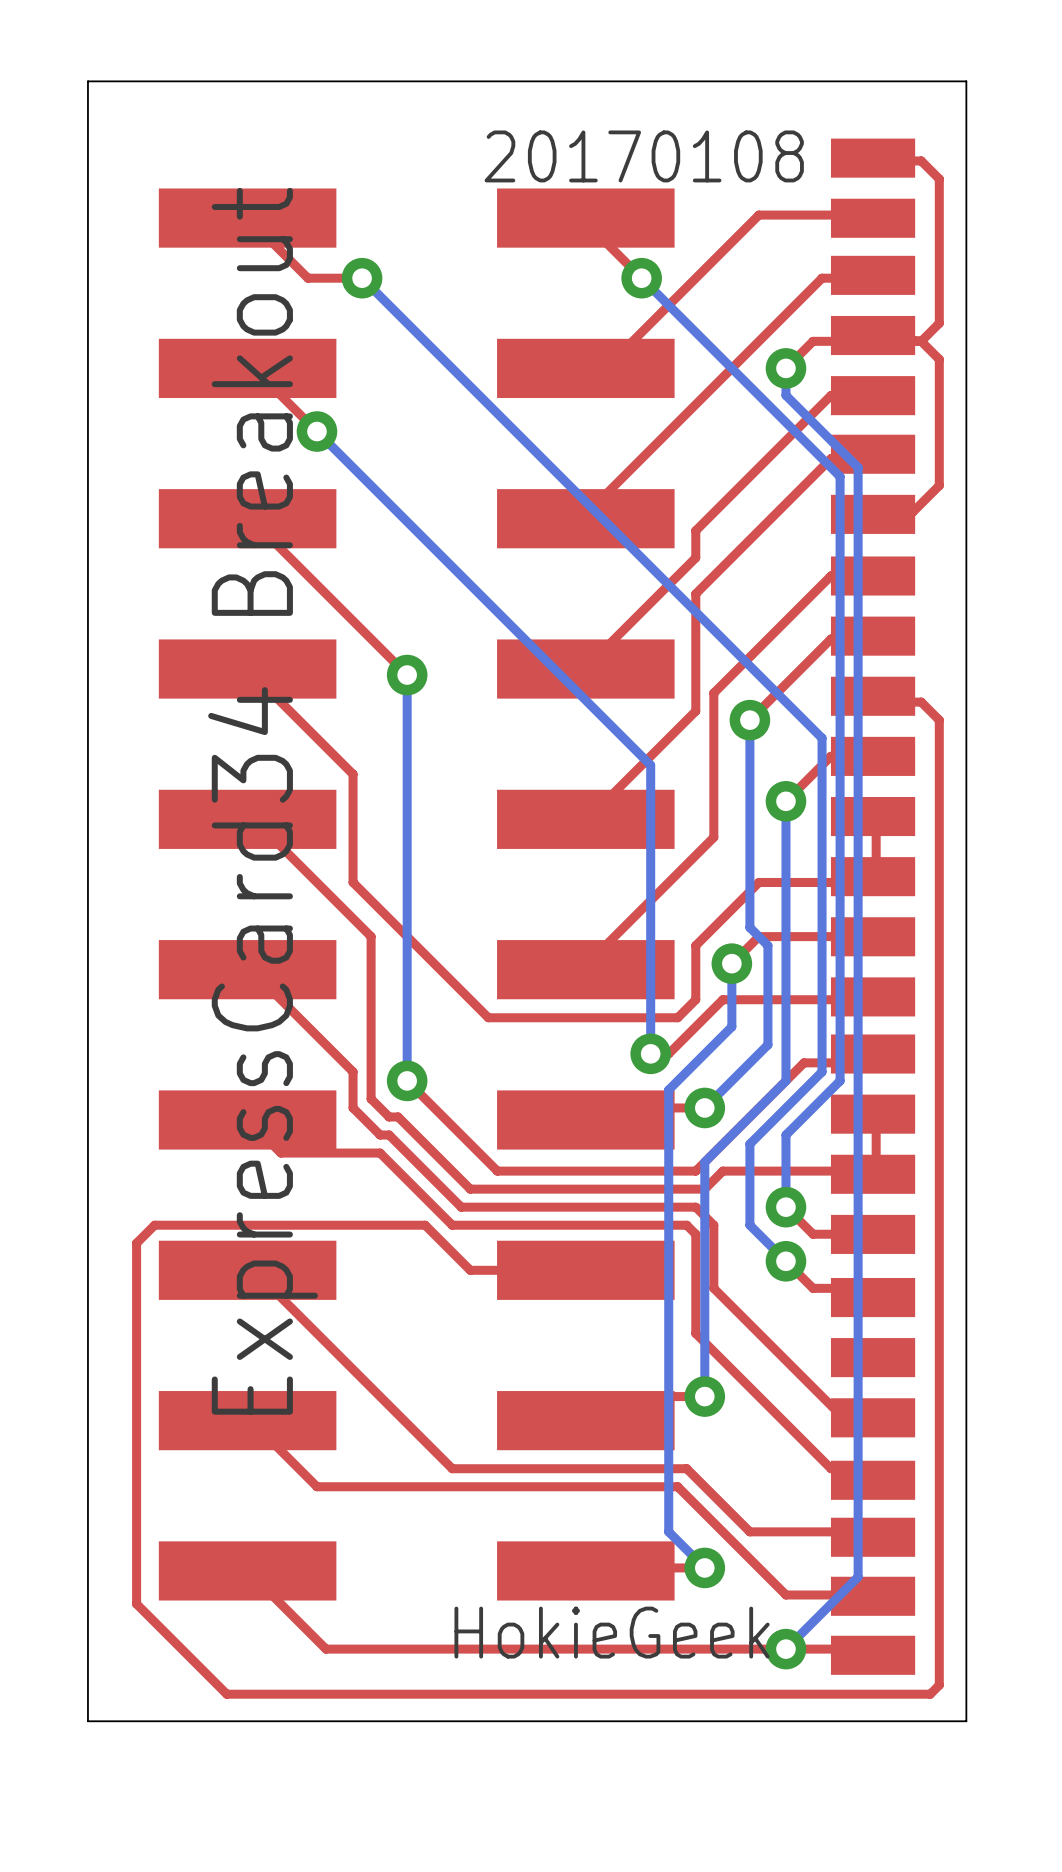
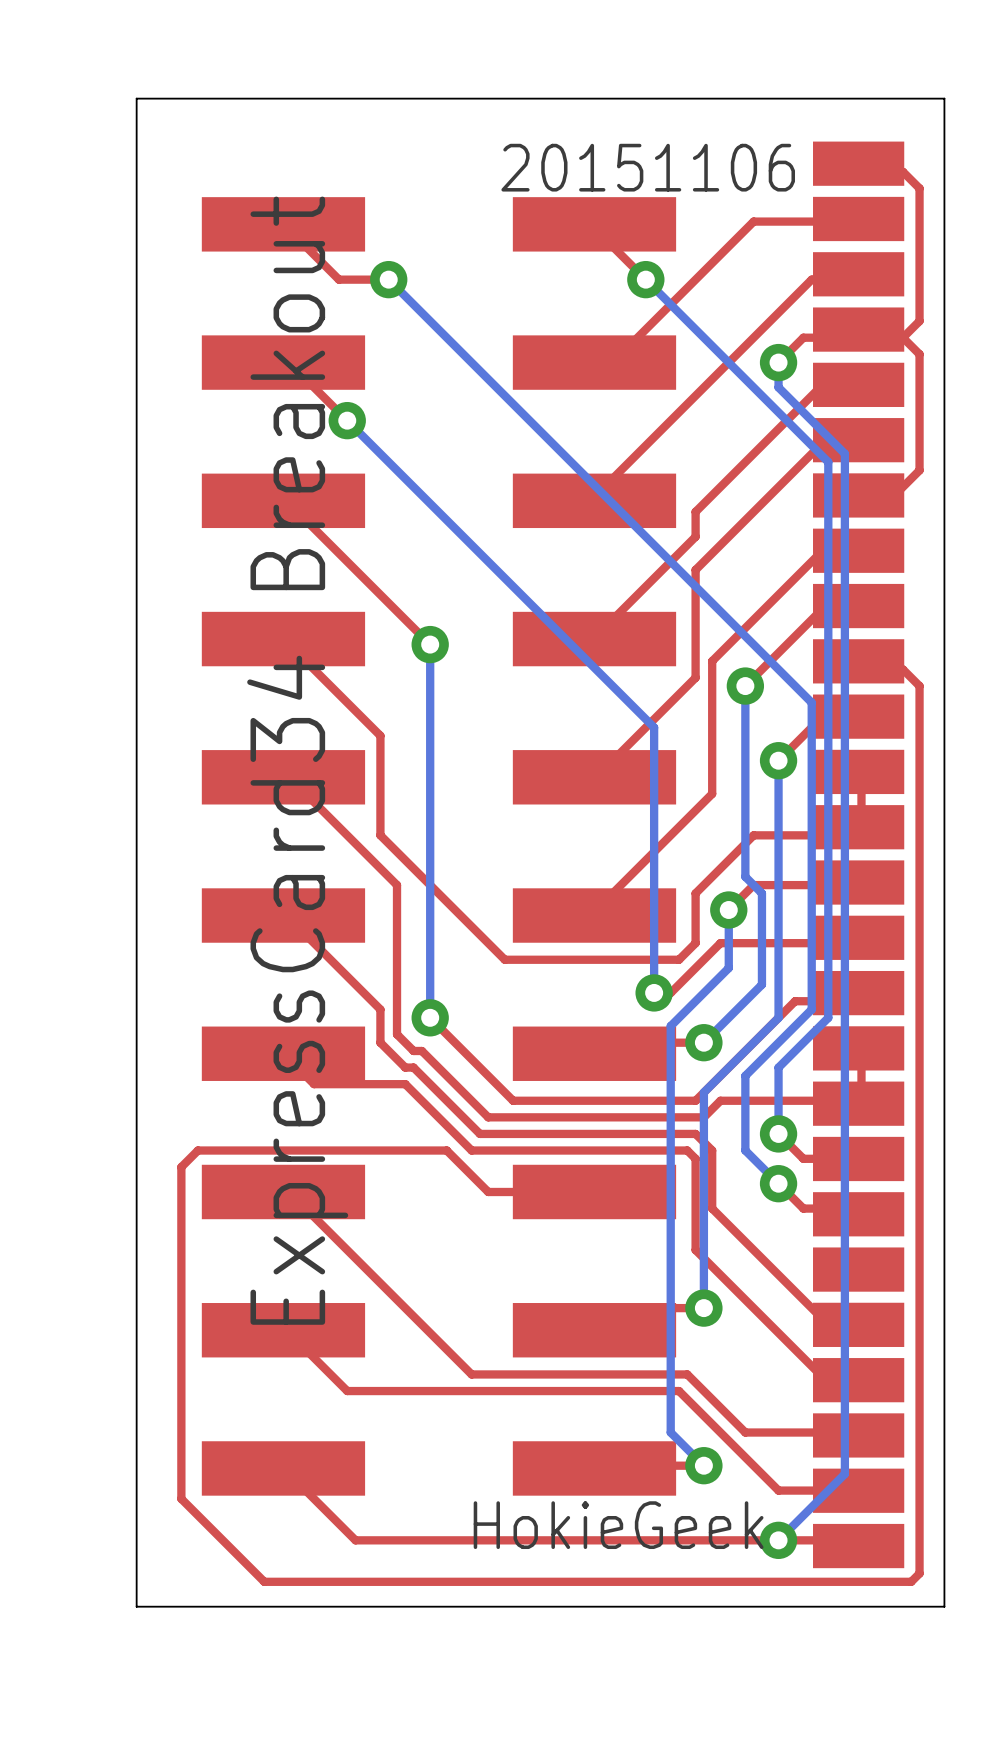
part footprint: [830, 138, 916, 1675] -> [813, 141, 905, 1569]
text: 20170108 (644, 156) -> 20151106 (648, 167)

